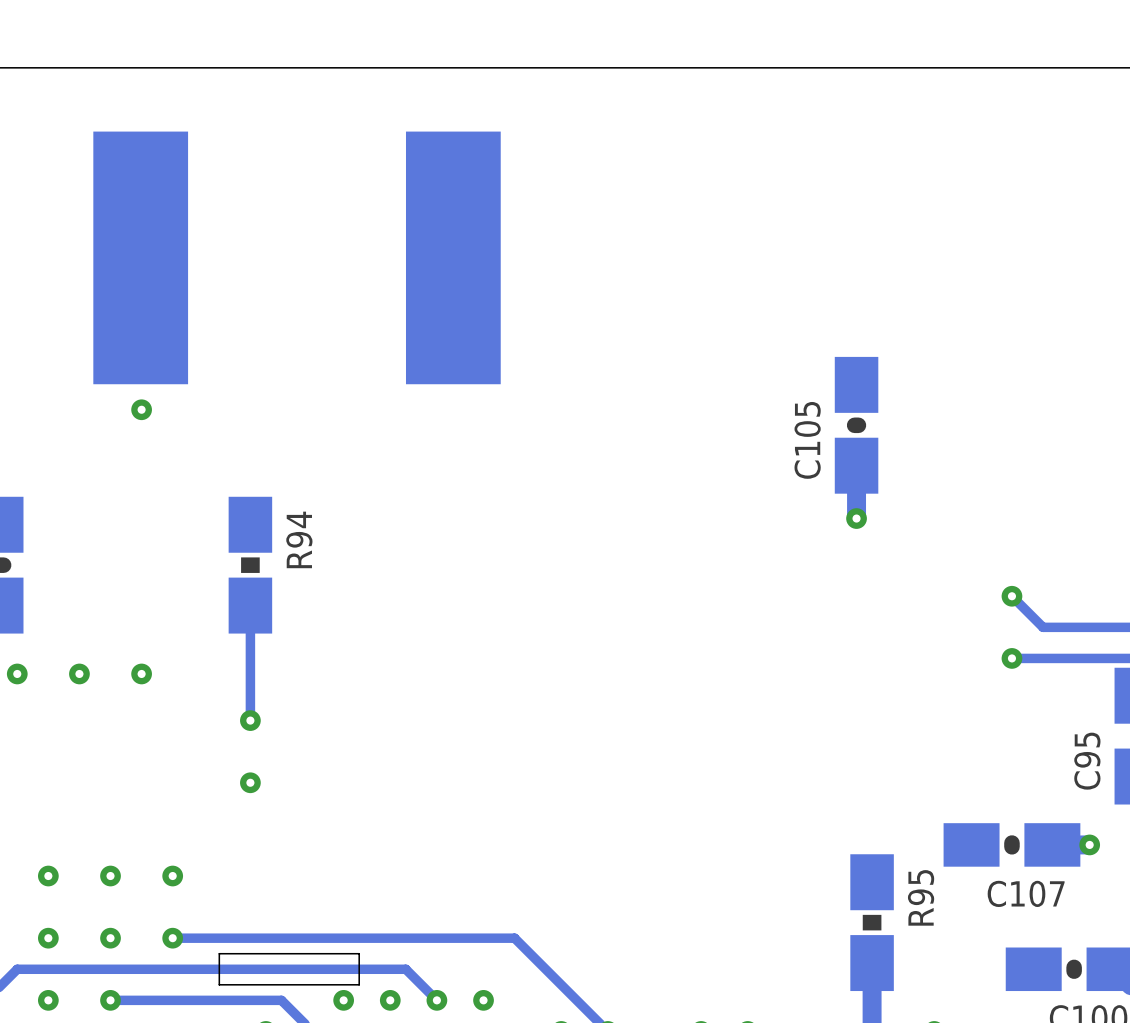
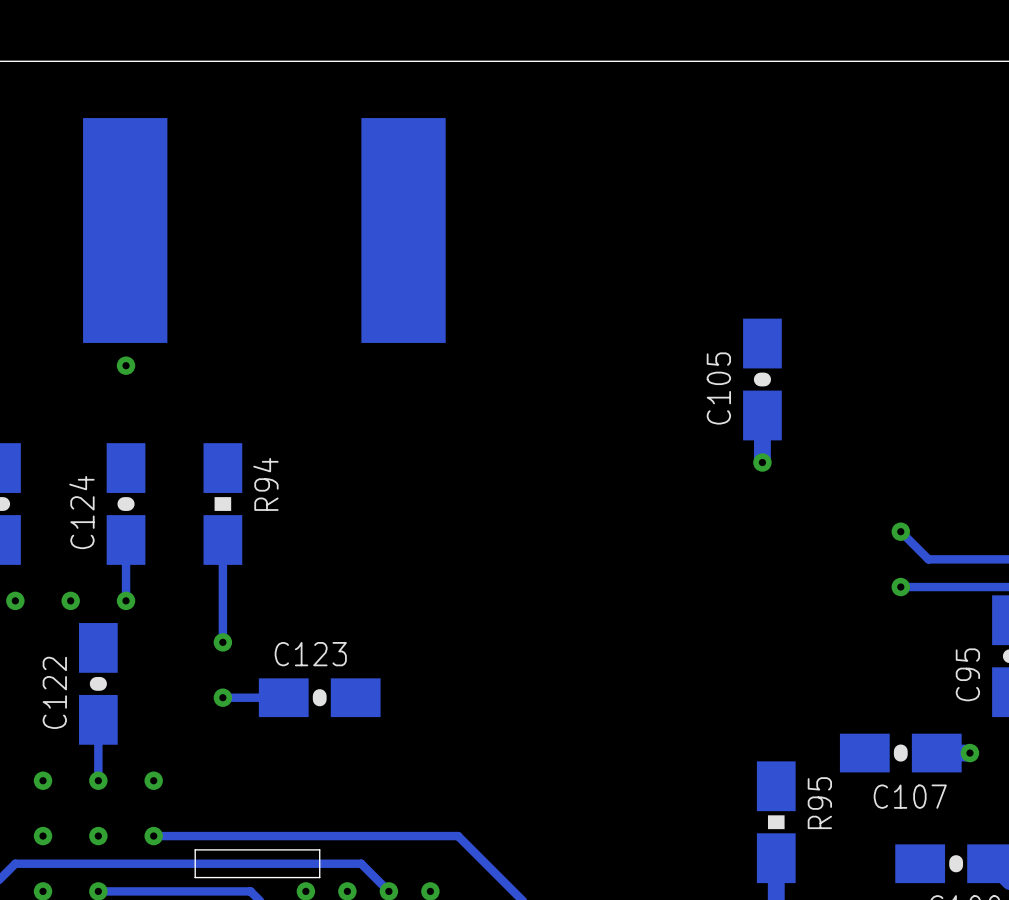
C124: none -> (126, 504)
track: none -> (126, 539) (126, 600)
C122: none -> (98, 683)
track: none -> (283, 697) (222, 697)
C123: none -> (319, 697)
track: none -> (98, 719) (98, 780)

